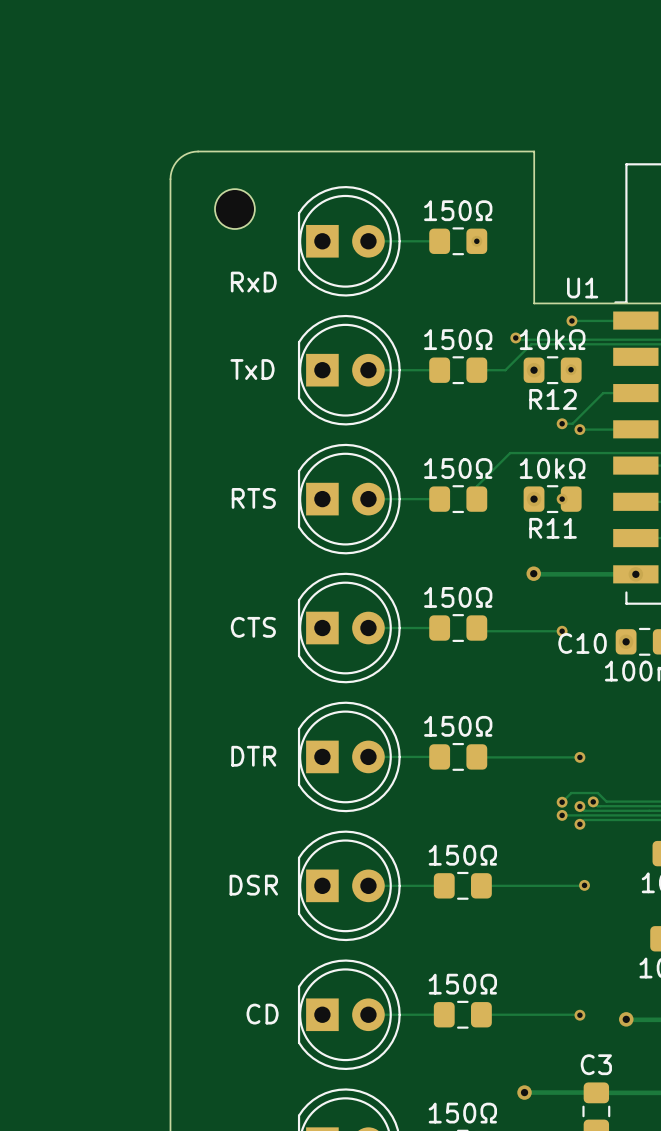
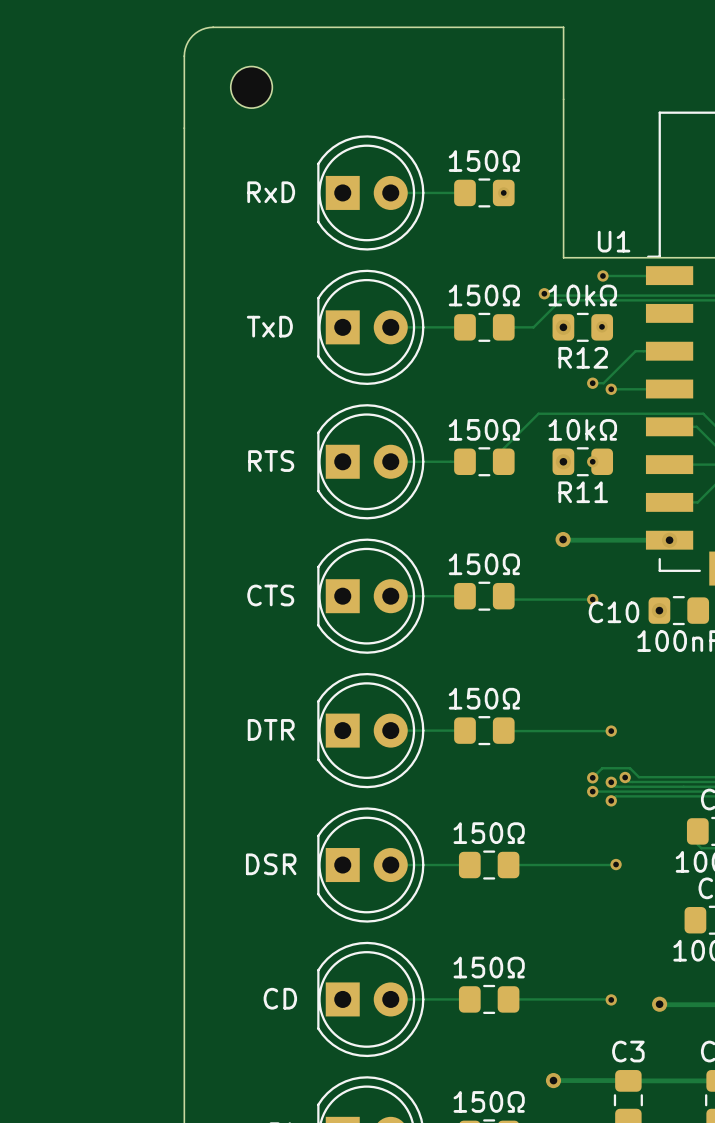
board edge: (534, 151) (194, 151) (184, 155) (176, 162) (170, 179) -> (563, 99) (563, 27) (209, 27) (192, 35) (185, 48) (184, 128)
part position: (234, 209) -> (251, 87)
part value position: RxD (253, 282) -> RxD (271, 192)

